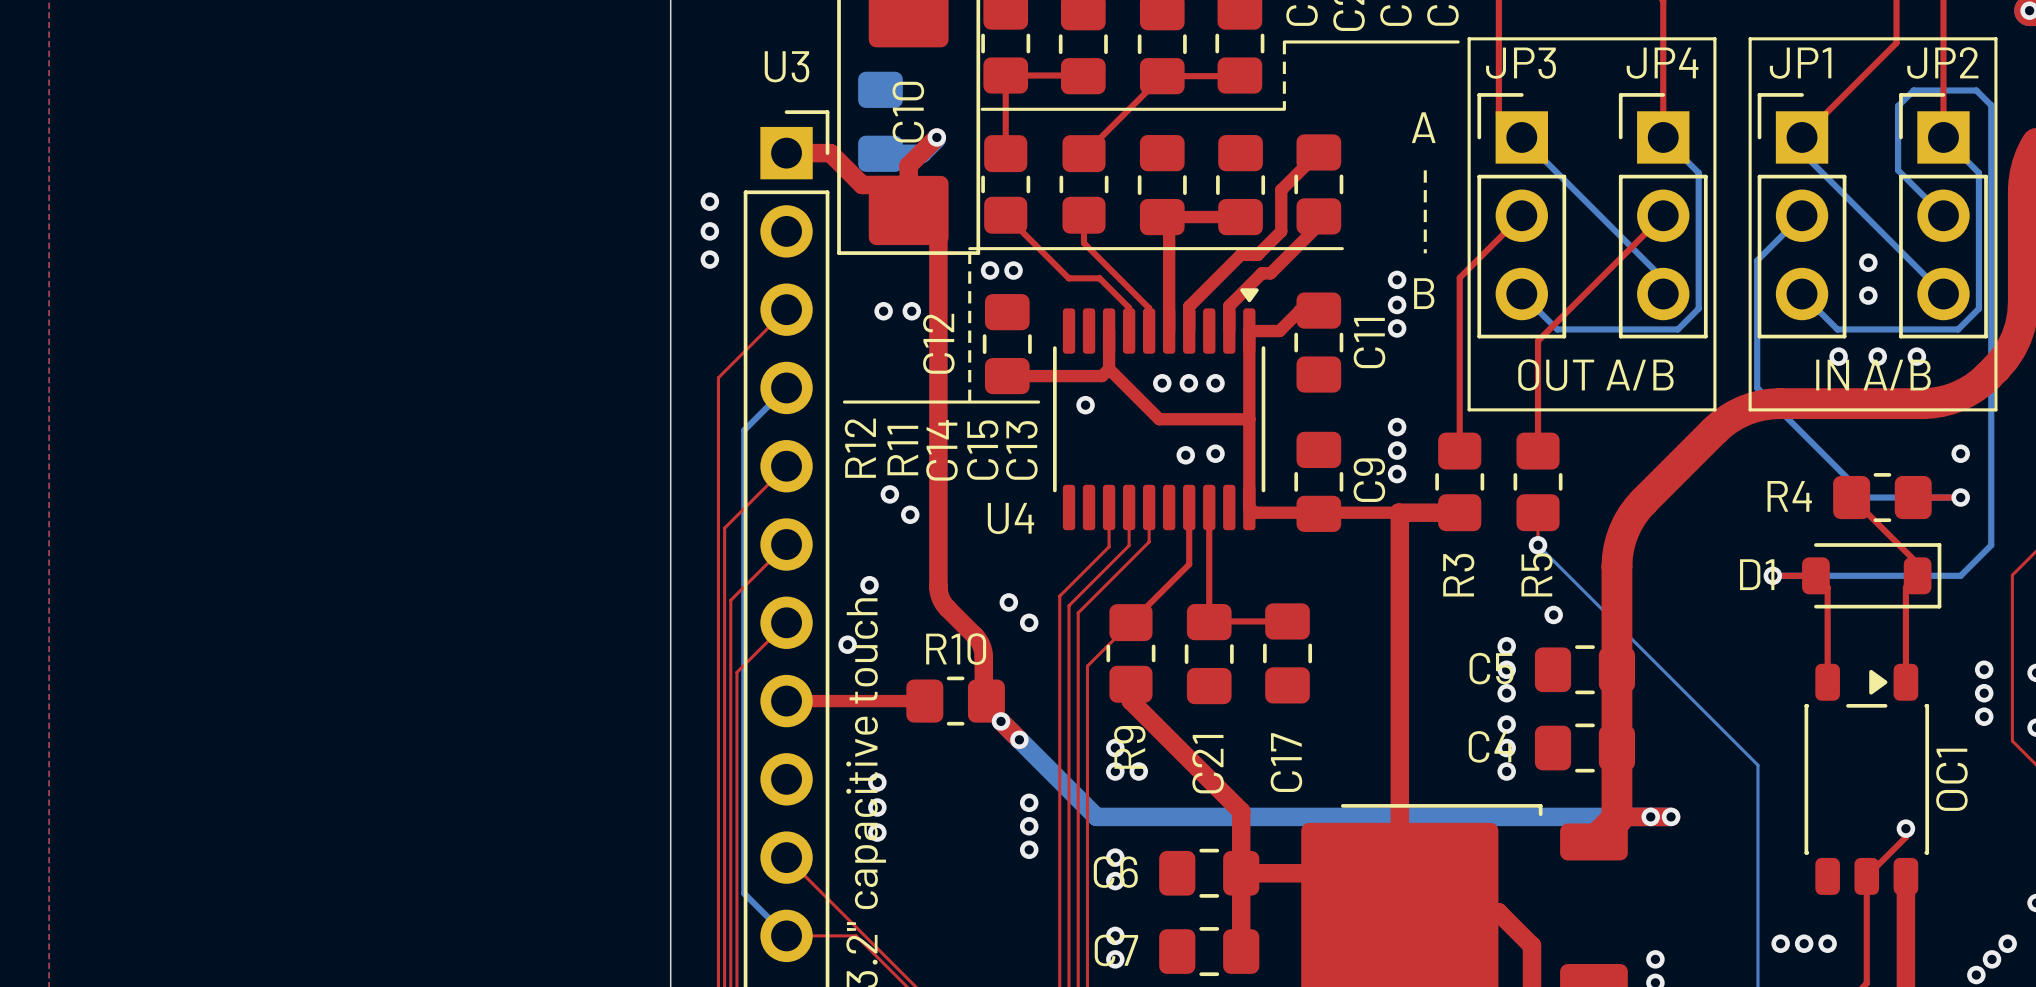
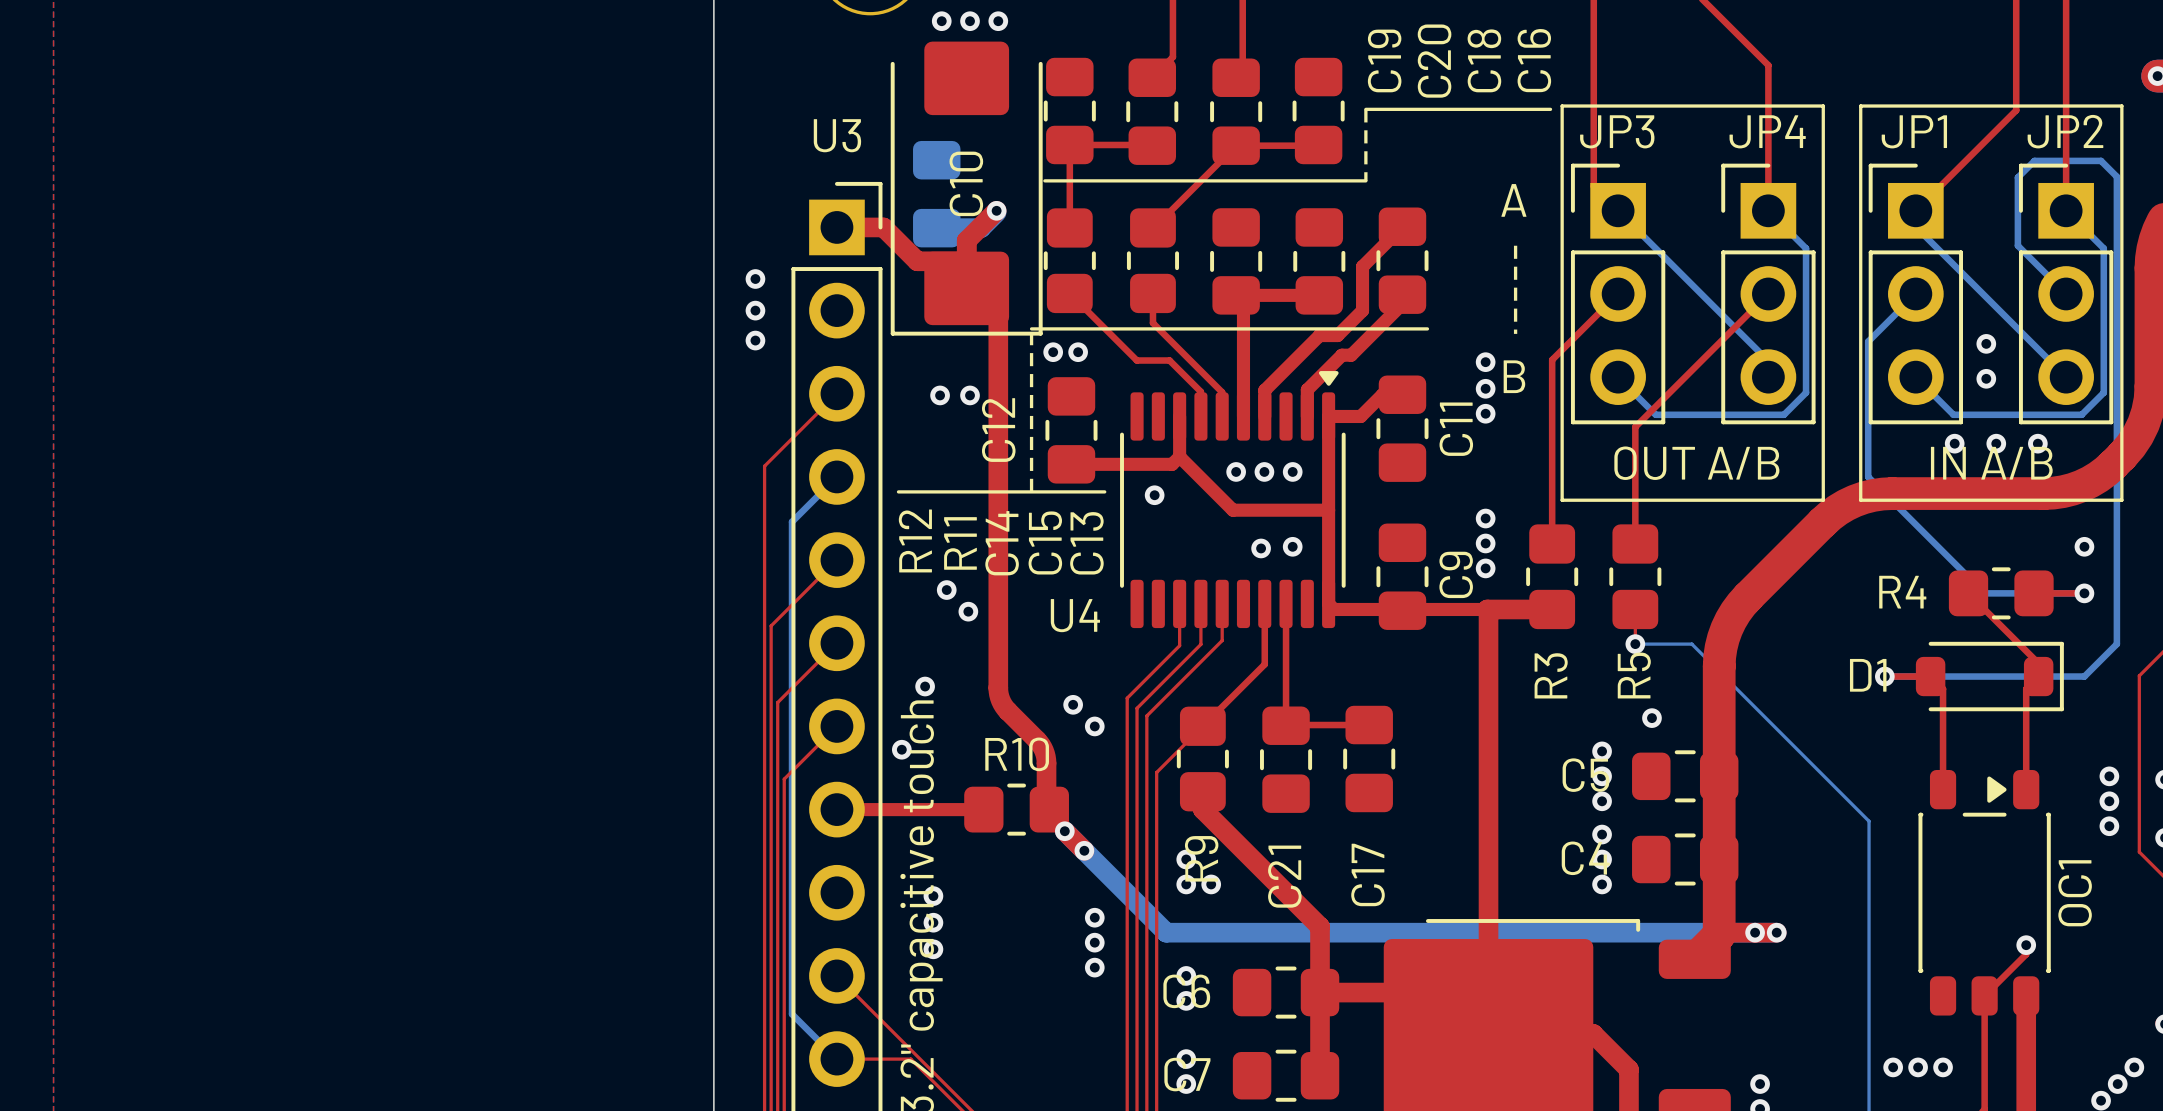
bottom track: (1538, 545) (1757, 765) -> (1635, 644) (1691, 644) (1869, 821) (1869, 877)

